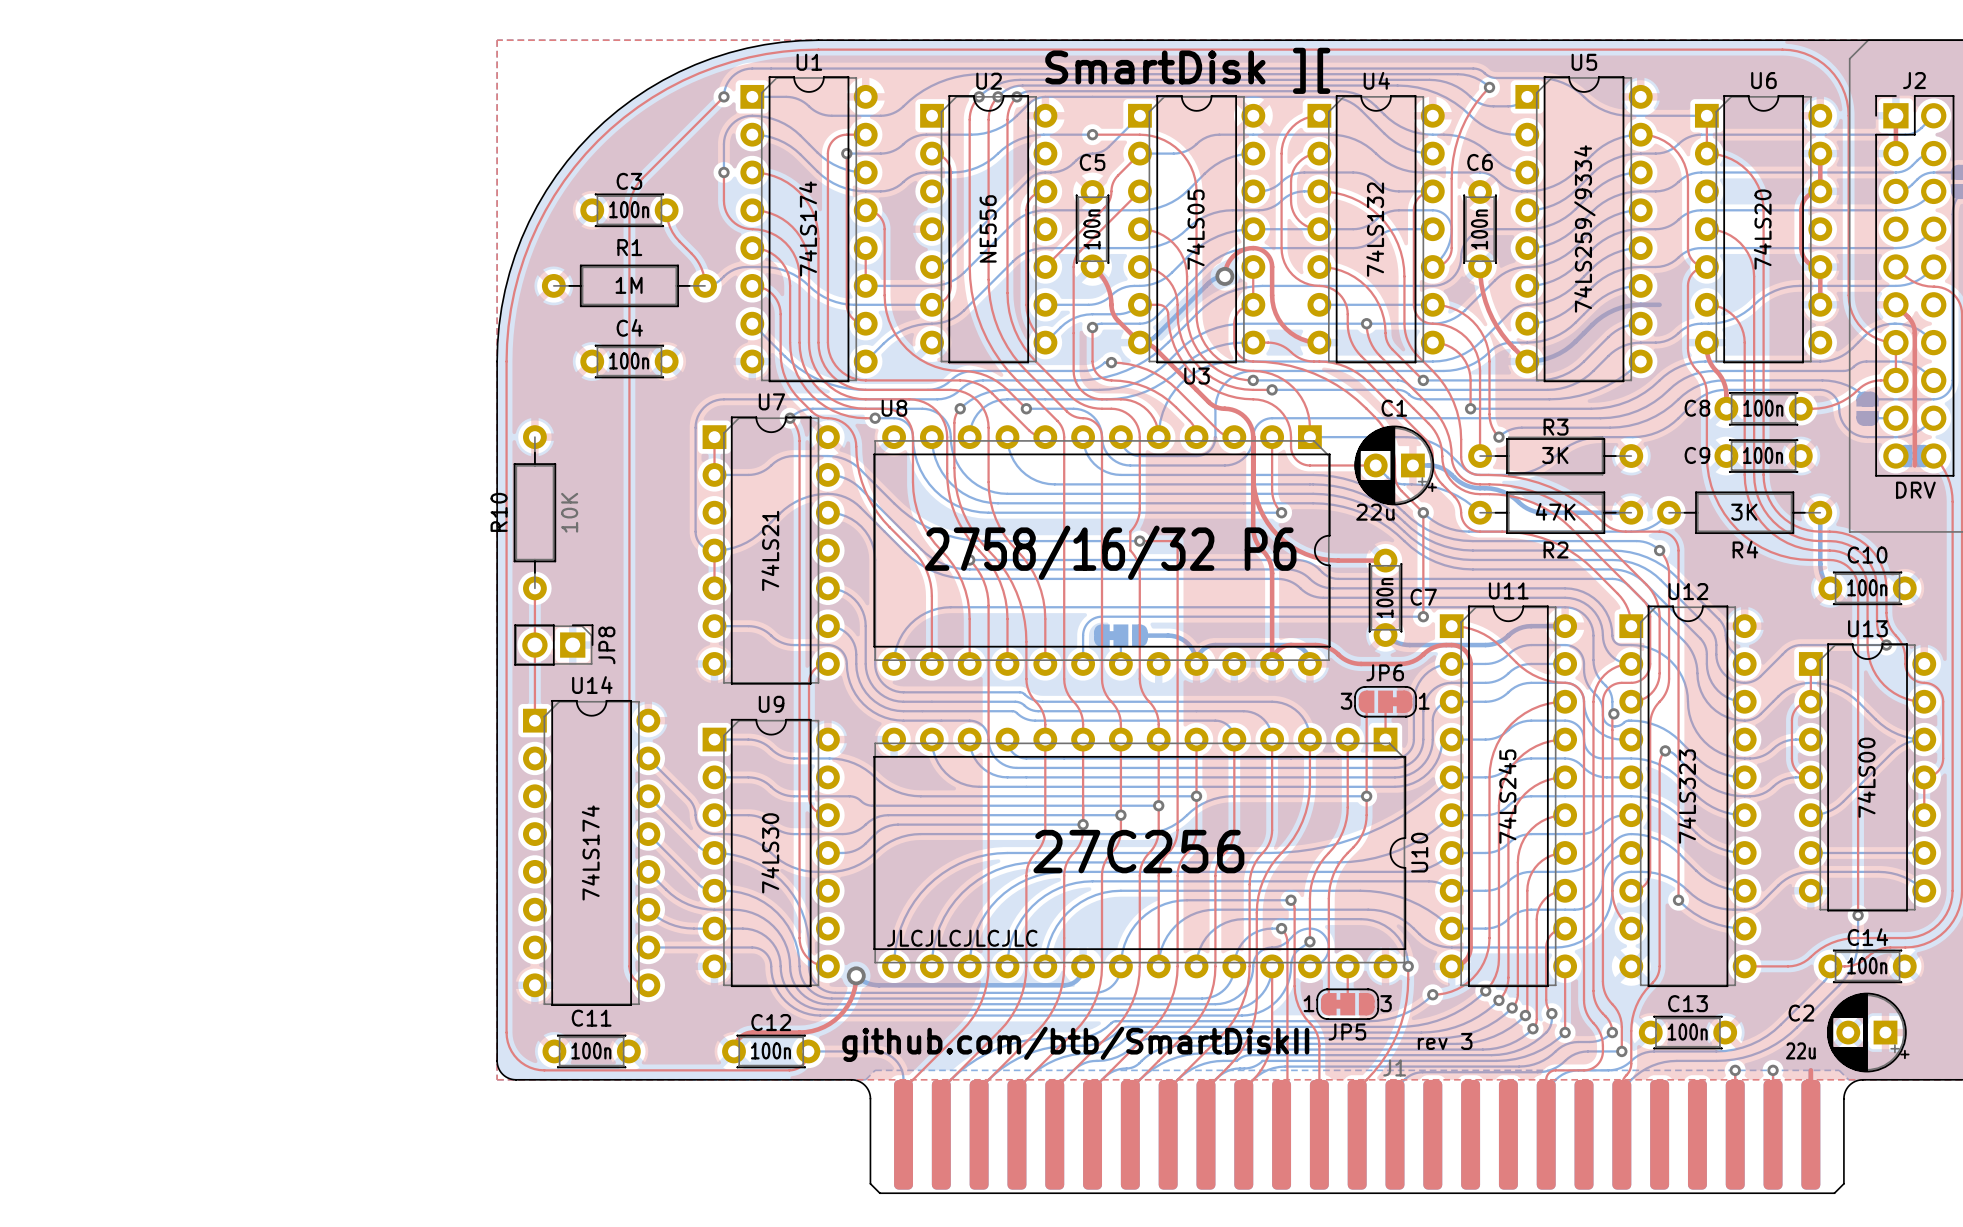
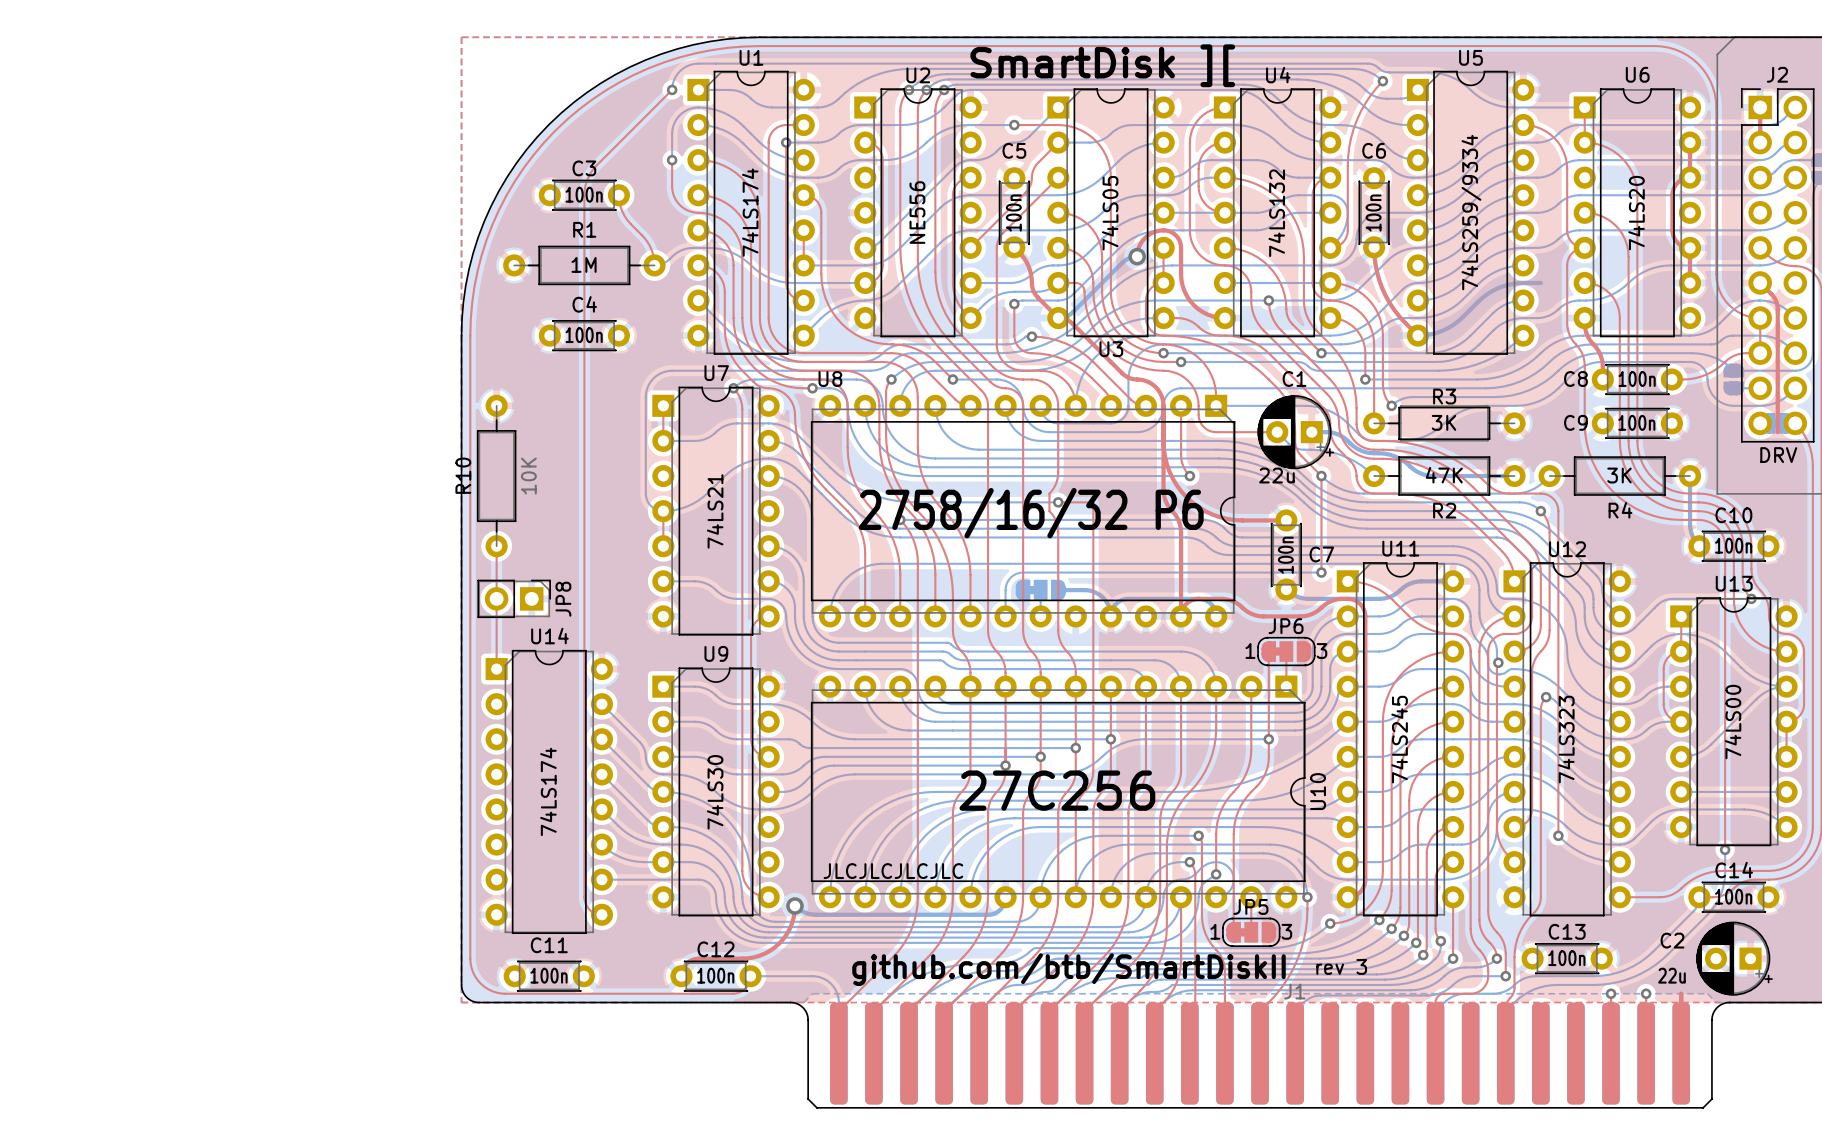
JP6 rotation: 0° (1385, 701) -> 180° (1286, 651)
JP5 name position: JP5 (1347, 1032) -> JP5 (1250, 906)
text position: github.com/btb/SmartDiskII (1075, 1044) -> github.com/btb/SmartDiskII (1068, 969)

